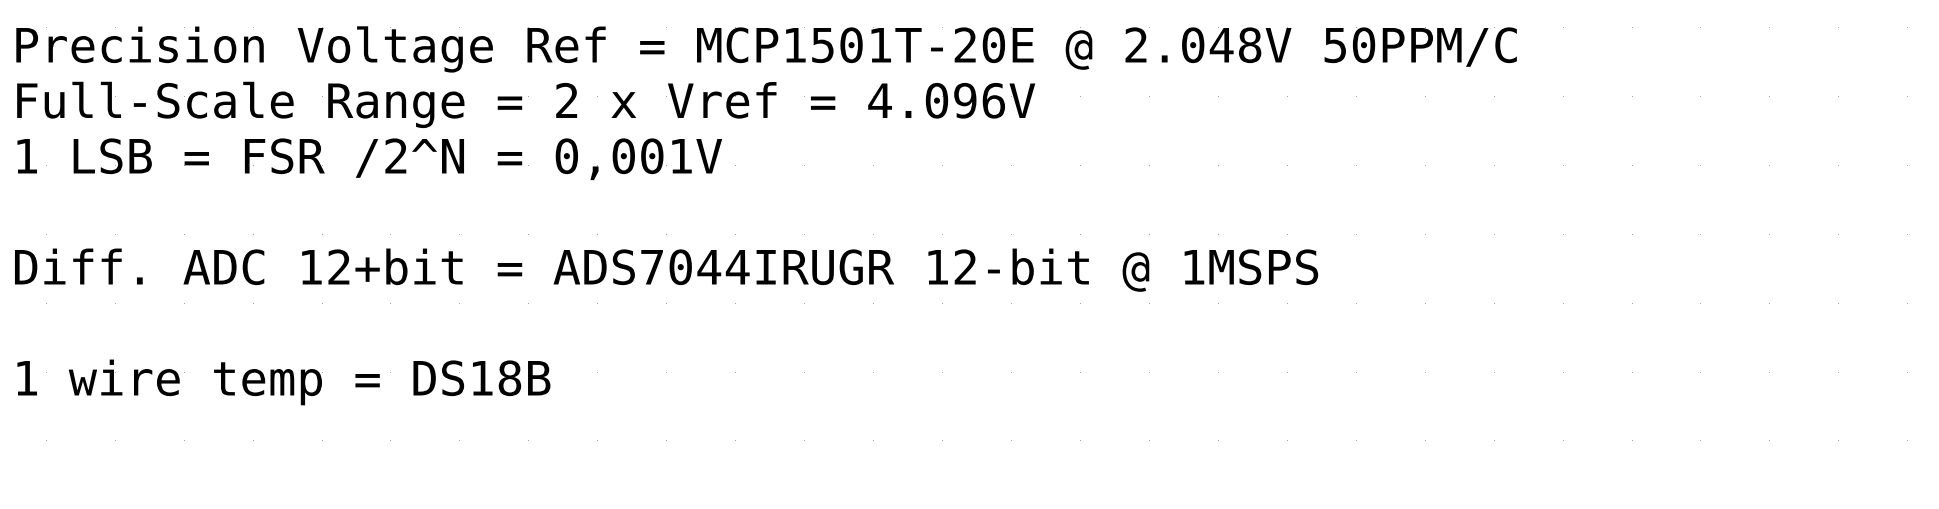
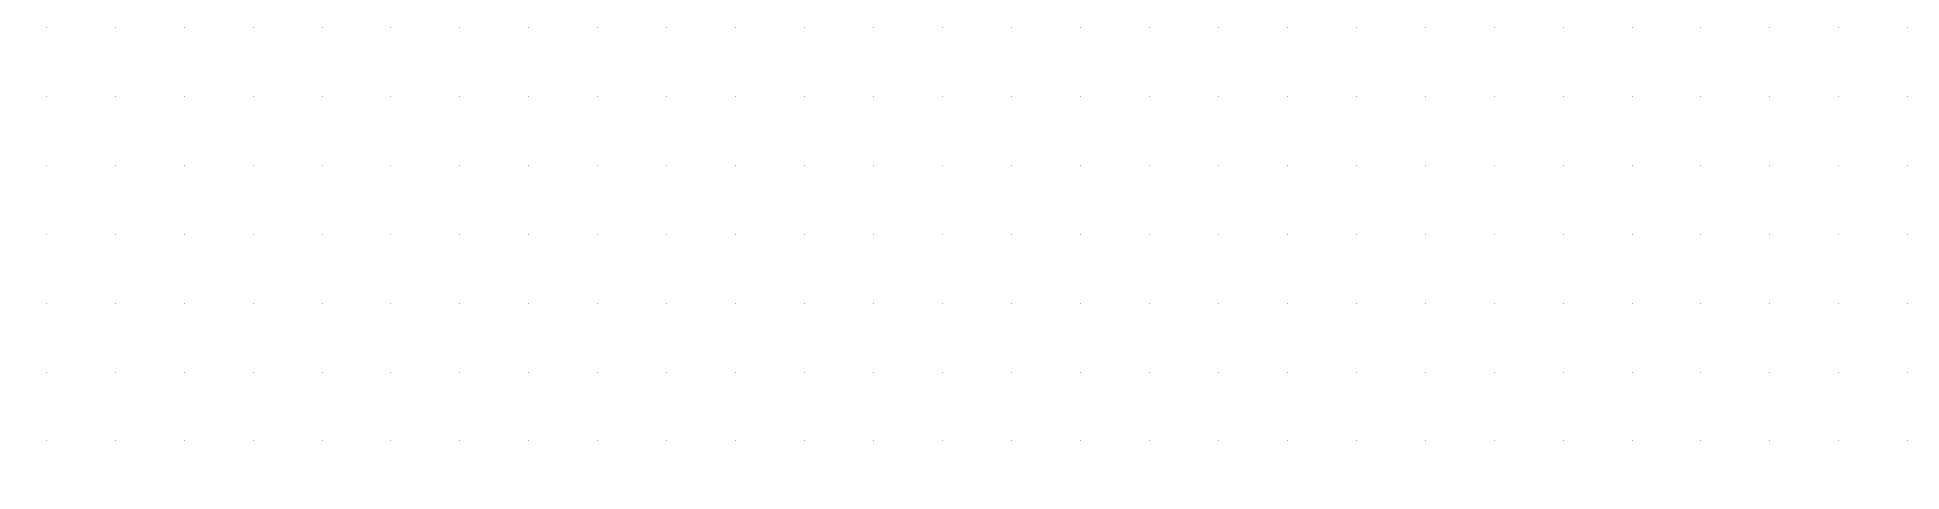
text: Precision Voltage Ref = MCP1501T-20E @ 2.048V 50PPM/C (766, 49) -> none
text: Full-Scale Range = 2 x Vref = 4.096V (526, 104) -> none
text: 1 LSB = FSR /2^N = 0,001V (369, 159) -> none
text: Diff. ADC 12+bit = ADS7044IRUGR 12-bit @ 1MSPS (666, 270) -> none
text: 1 wire temp = DS18B (283, 382) -> none

